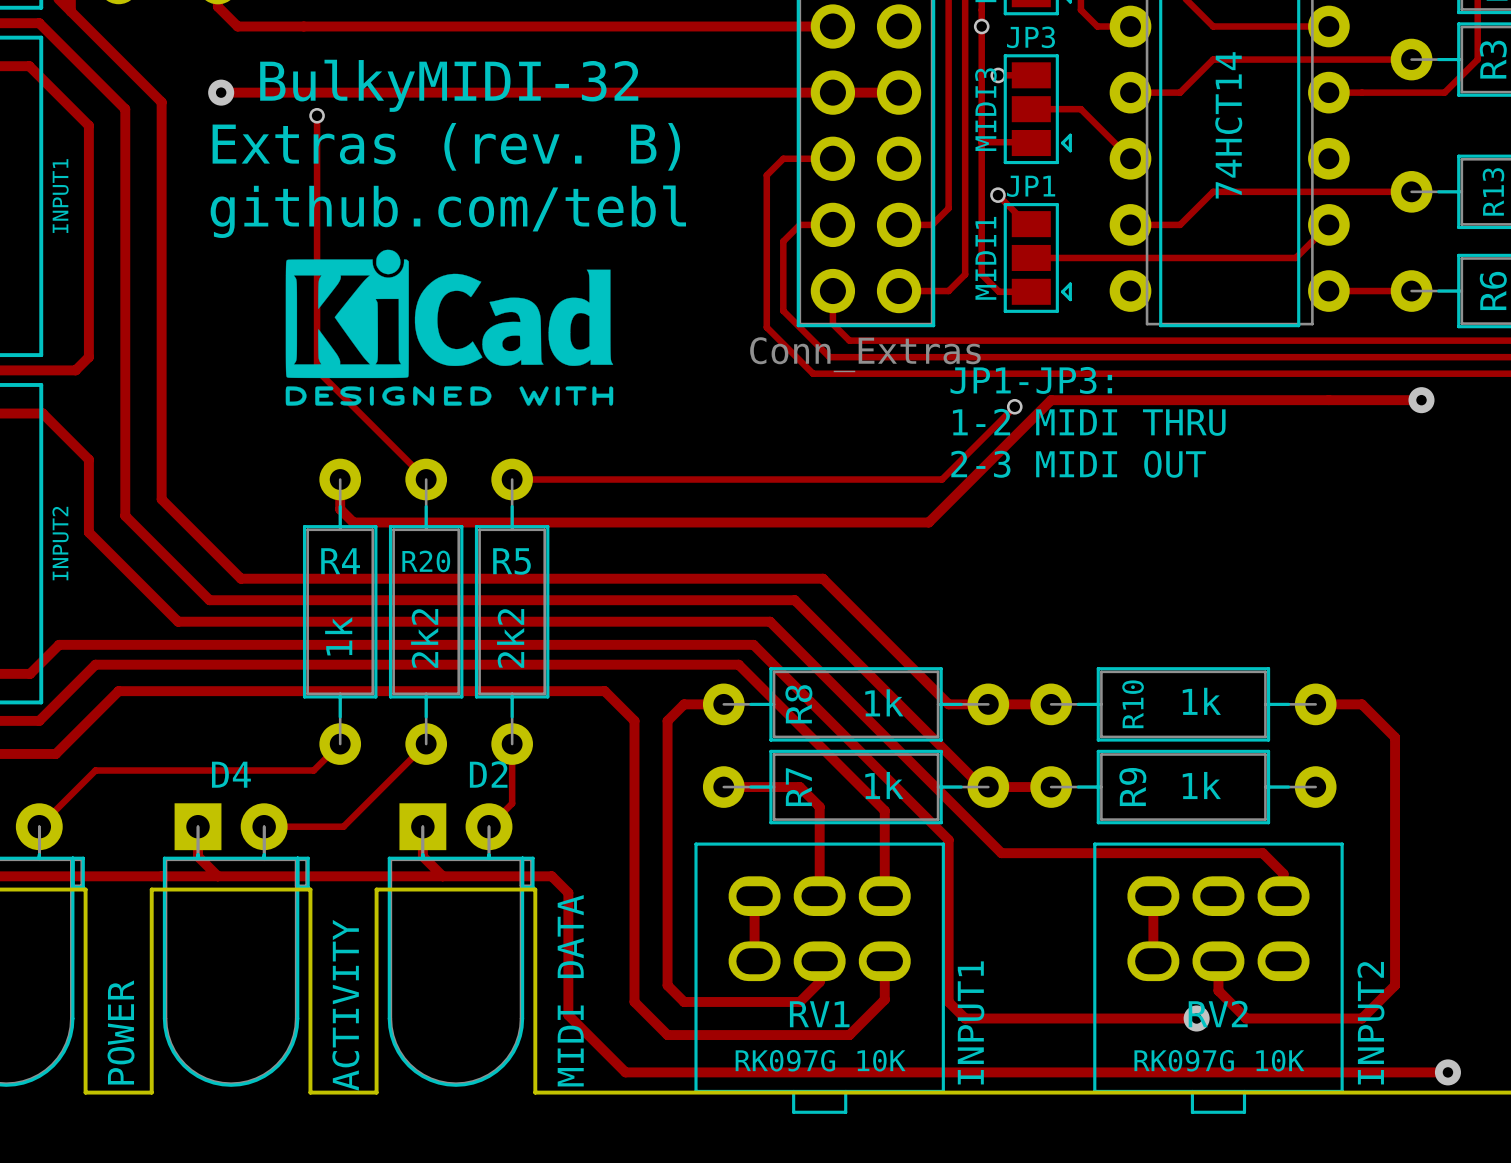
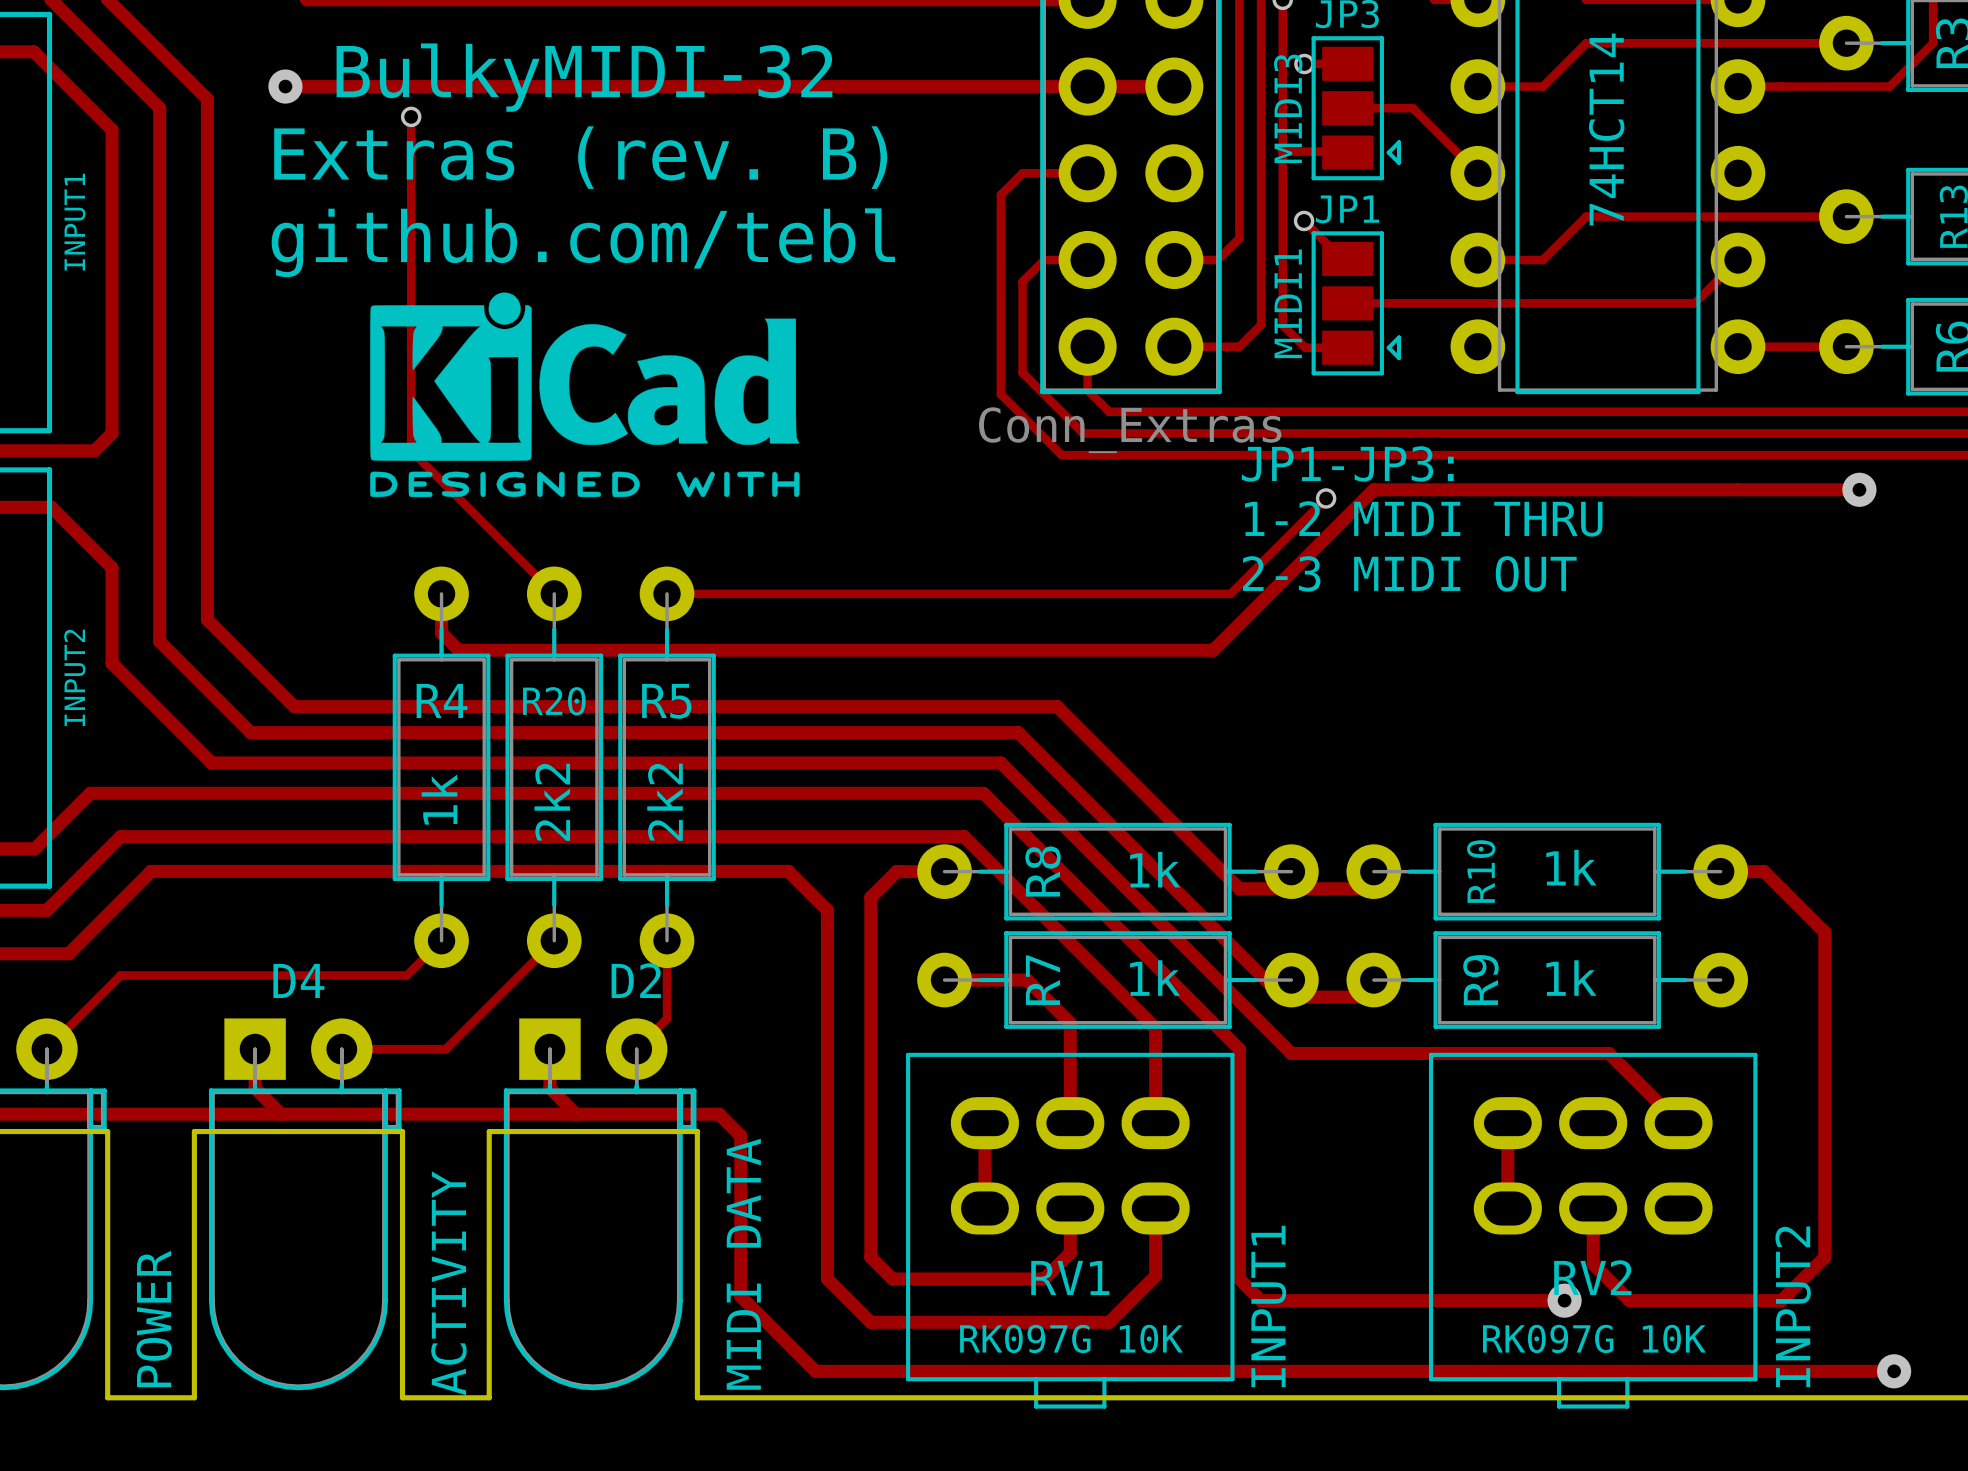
track: (227, 565) (241, 578) (822, 578) -> (294, 706) (1057, 706) (1074, 723)
track: (194, 585) (209, 600) (794, 600) -> (250, 732) (1018, 732) (1037, 752)
track: (164, 608) (178, 621) (770, 621) (1001, 853) (1262, 853) (1283, 873) (1283, 896) -> (211, 762) (1000, 762) (1291, 1053) (1608, 1053) (1678, 1123)
track: (59, 644) (753, 644) (948, 839) -> (72, 810) (90, 793) (983, 793) (1239, 1049) (1239, 1066)
track: (723, 704) (684, 704) (667, 720) -> (944, 871) (896, 871) (870, 897) (870, 910)
R8 position: (856, 704) -> (1117, 871)
R10 position: (1183, 704) -> (1547, 871)
track: (1315, 704) (1361, 704) -> (1720, 871) (1764, 871) (1781, 888)
track: (723, 787) (799, 787) -> (944, 980) (1027, 980) (1044, 997)
R7 position: (856, 787) -> (1117, 980)
R9 position: (1183, 787) -> (1547, 980)
RV1 position: (819, 978) -> (1070, 1230)
RV2 position: (1218, 978) -> (1593, 1230)

